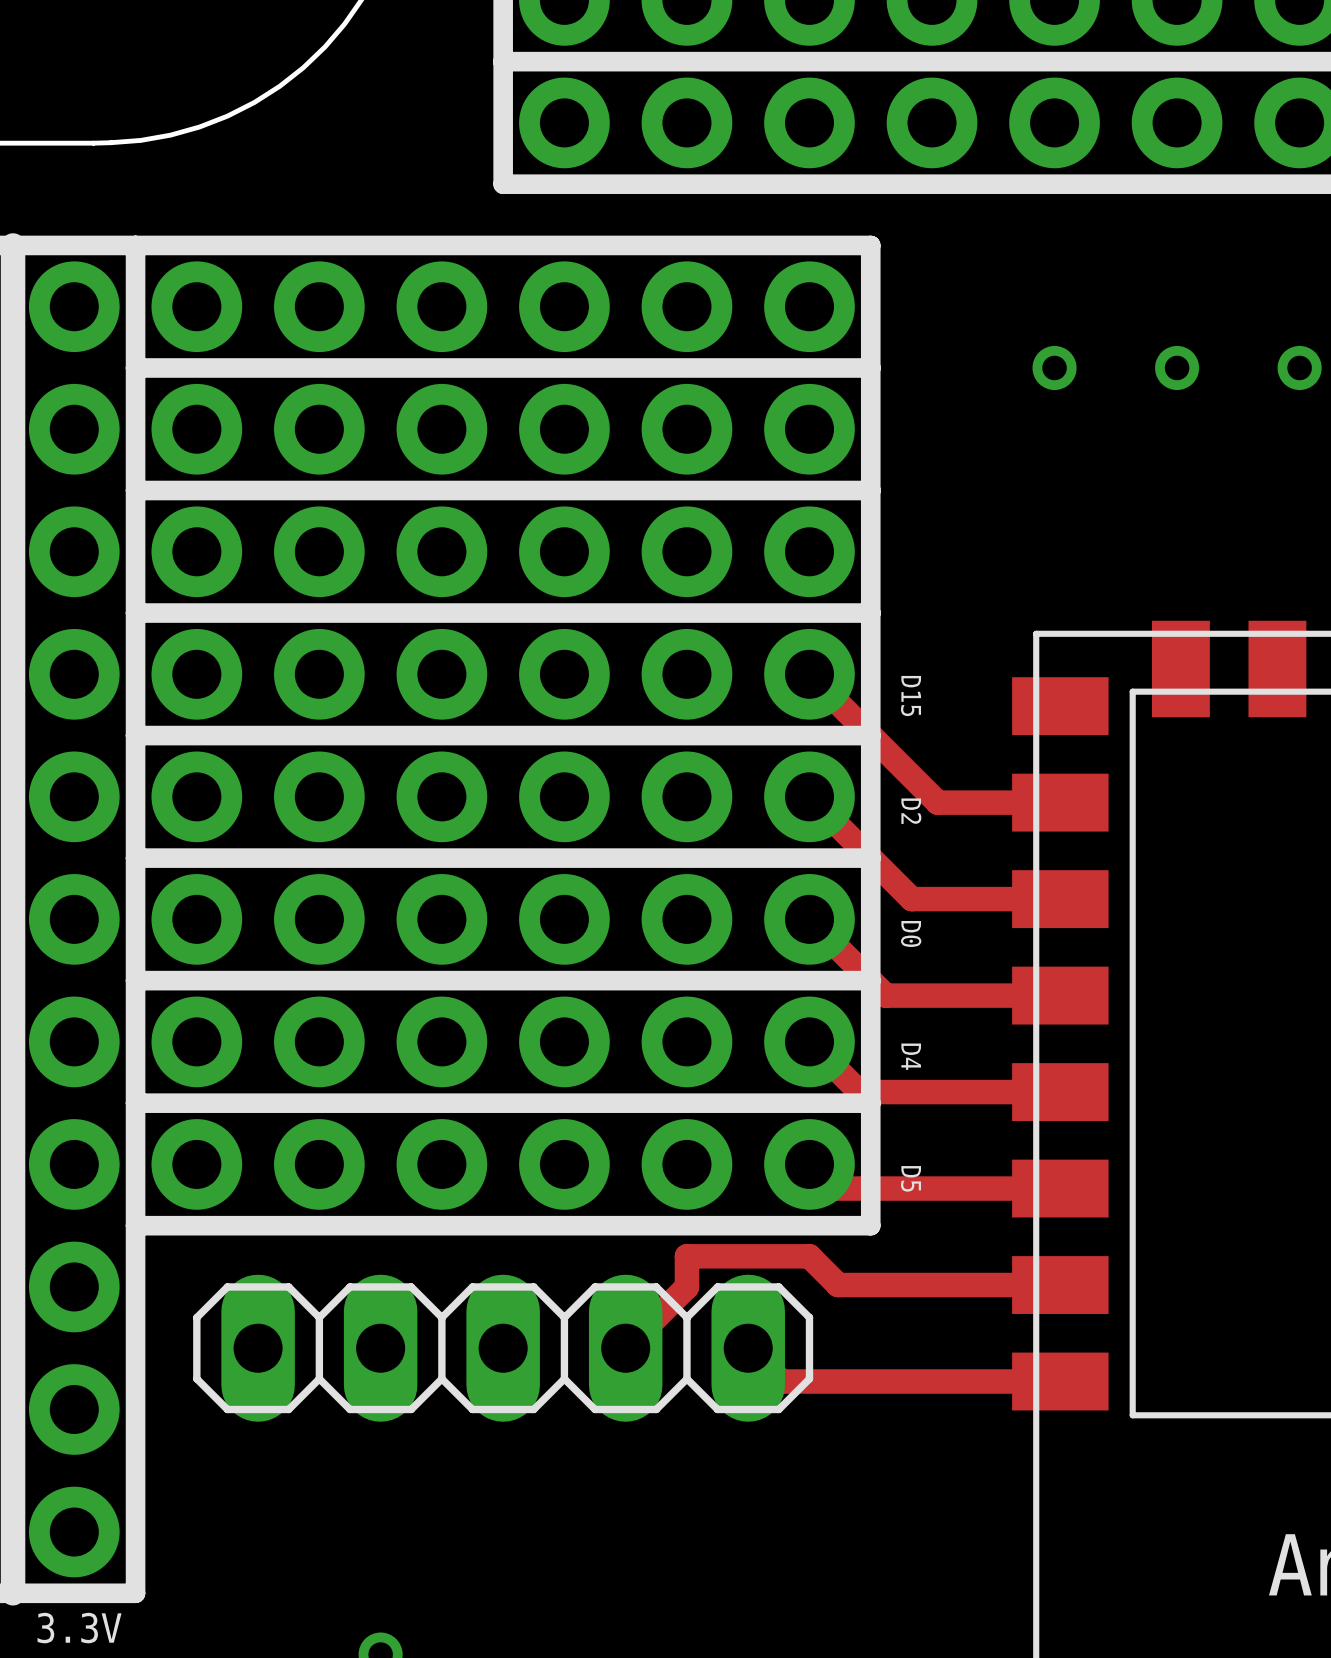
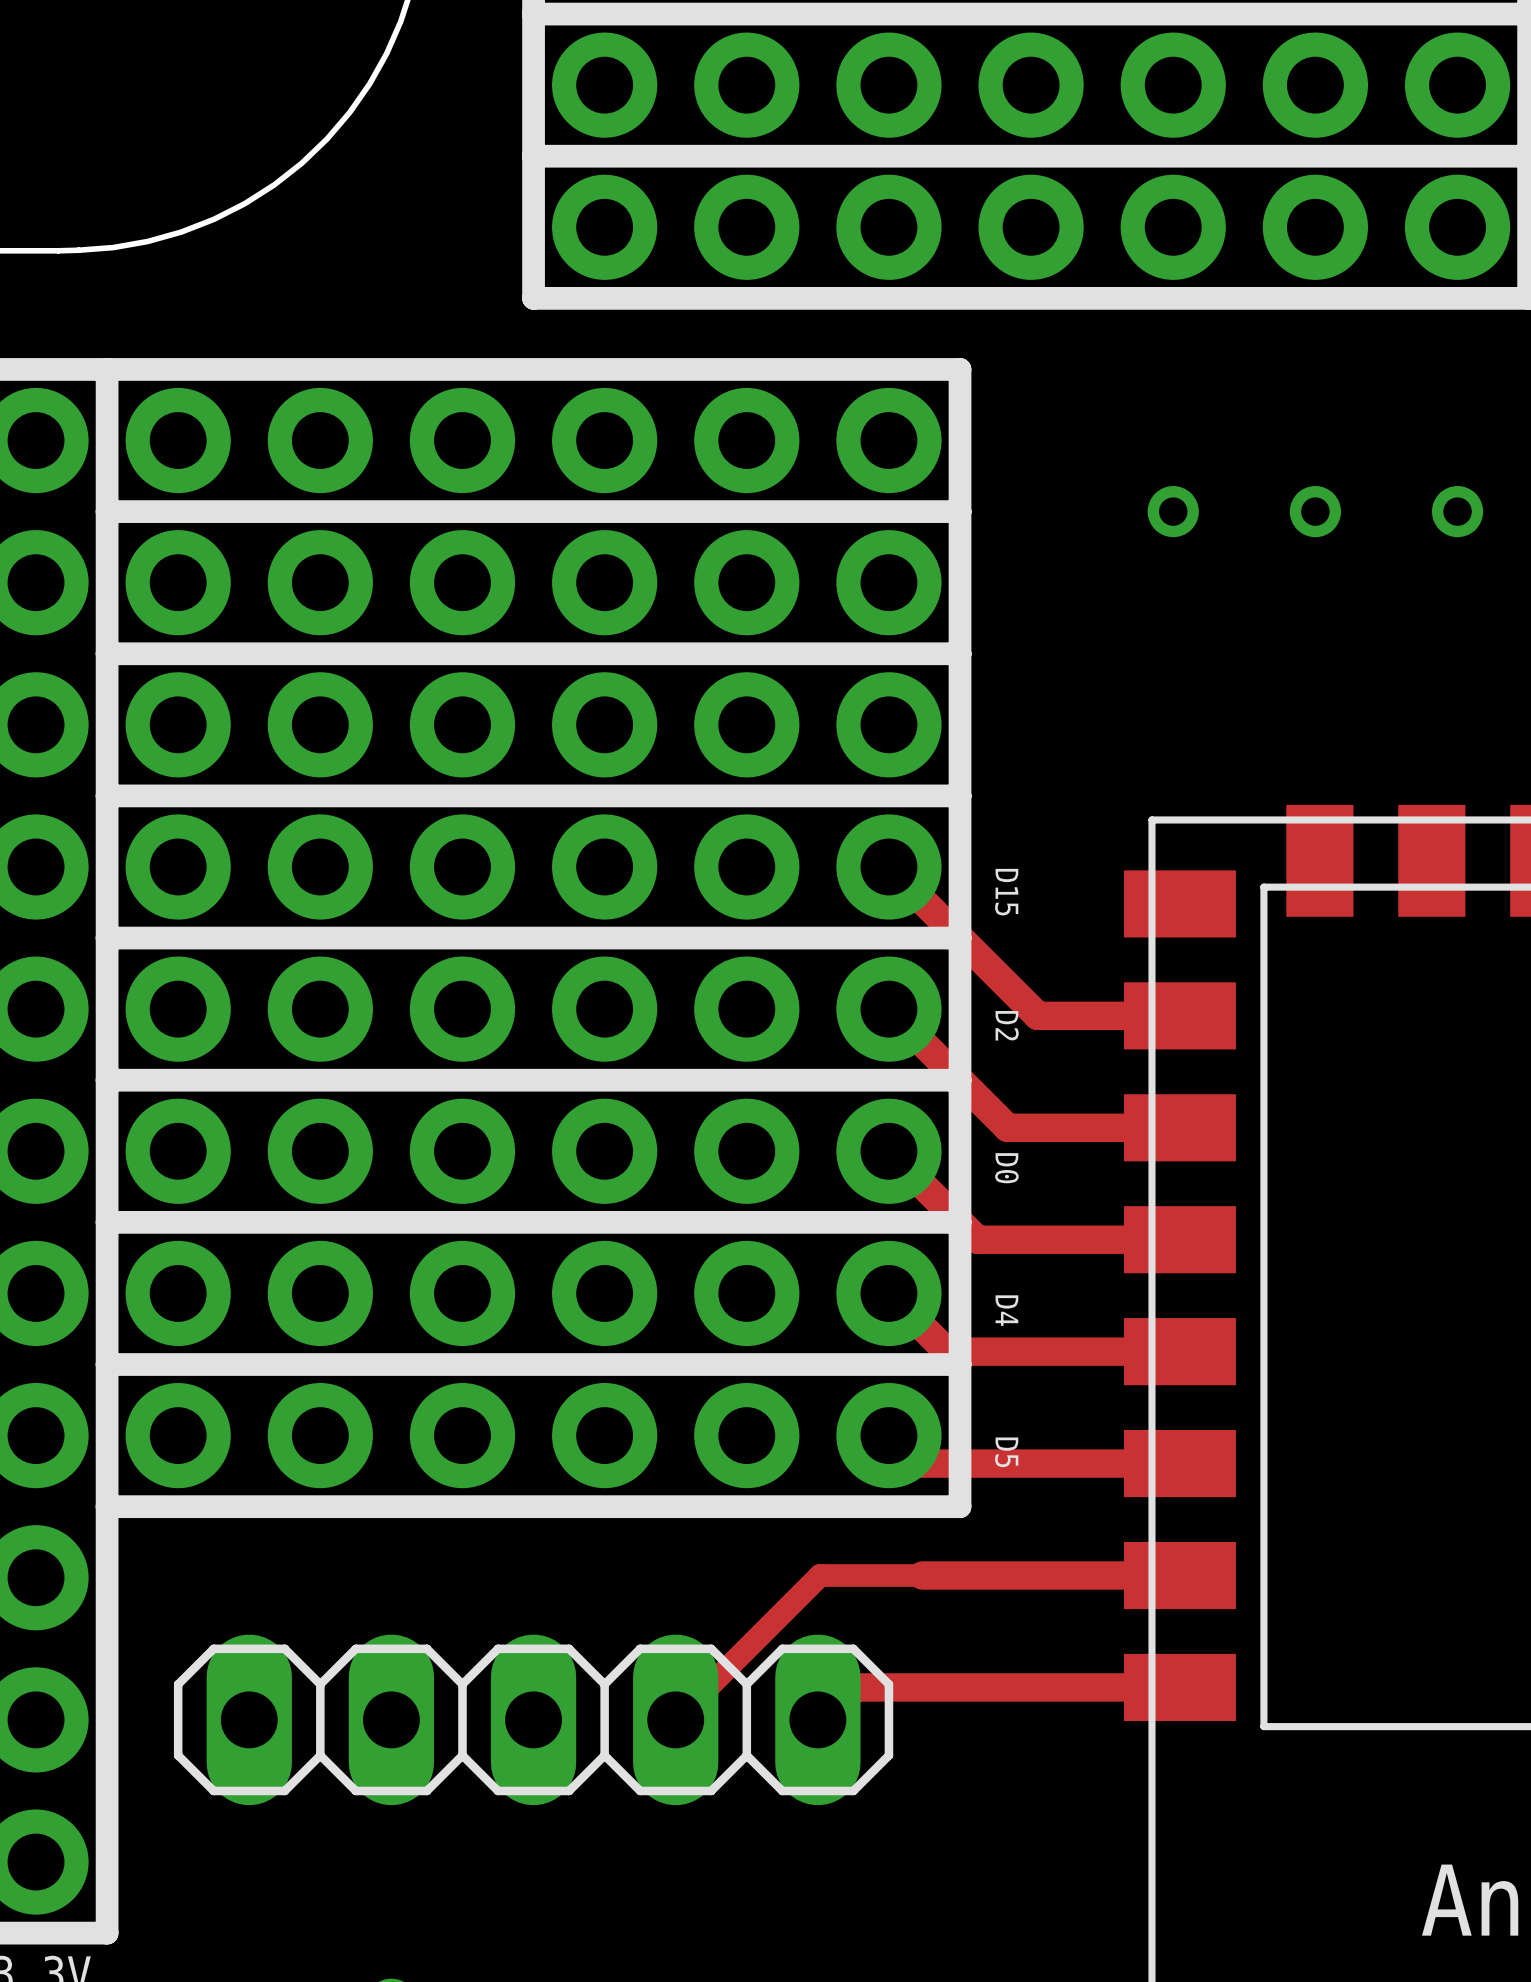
track: (838, 1285) (809, 1256) (686, 1256) (686, 1286) (625, 1348) -> (922, 1575) (820, 1575) (675, 1719)
part position: (503, 1348) -> (533, 1719)

